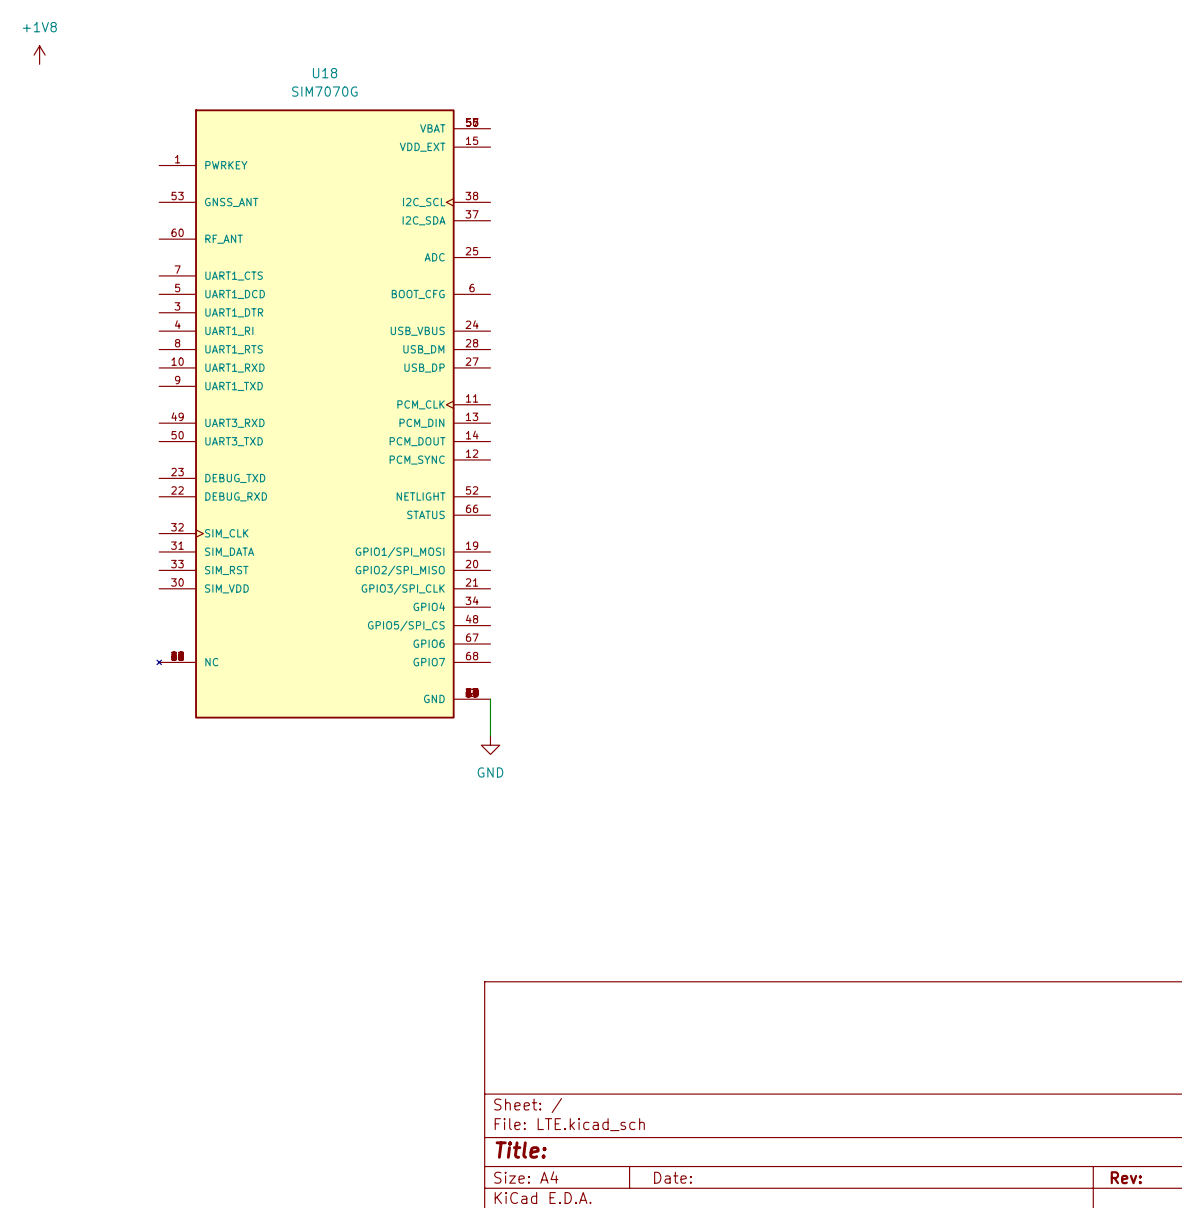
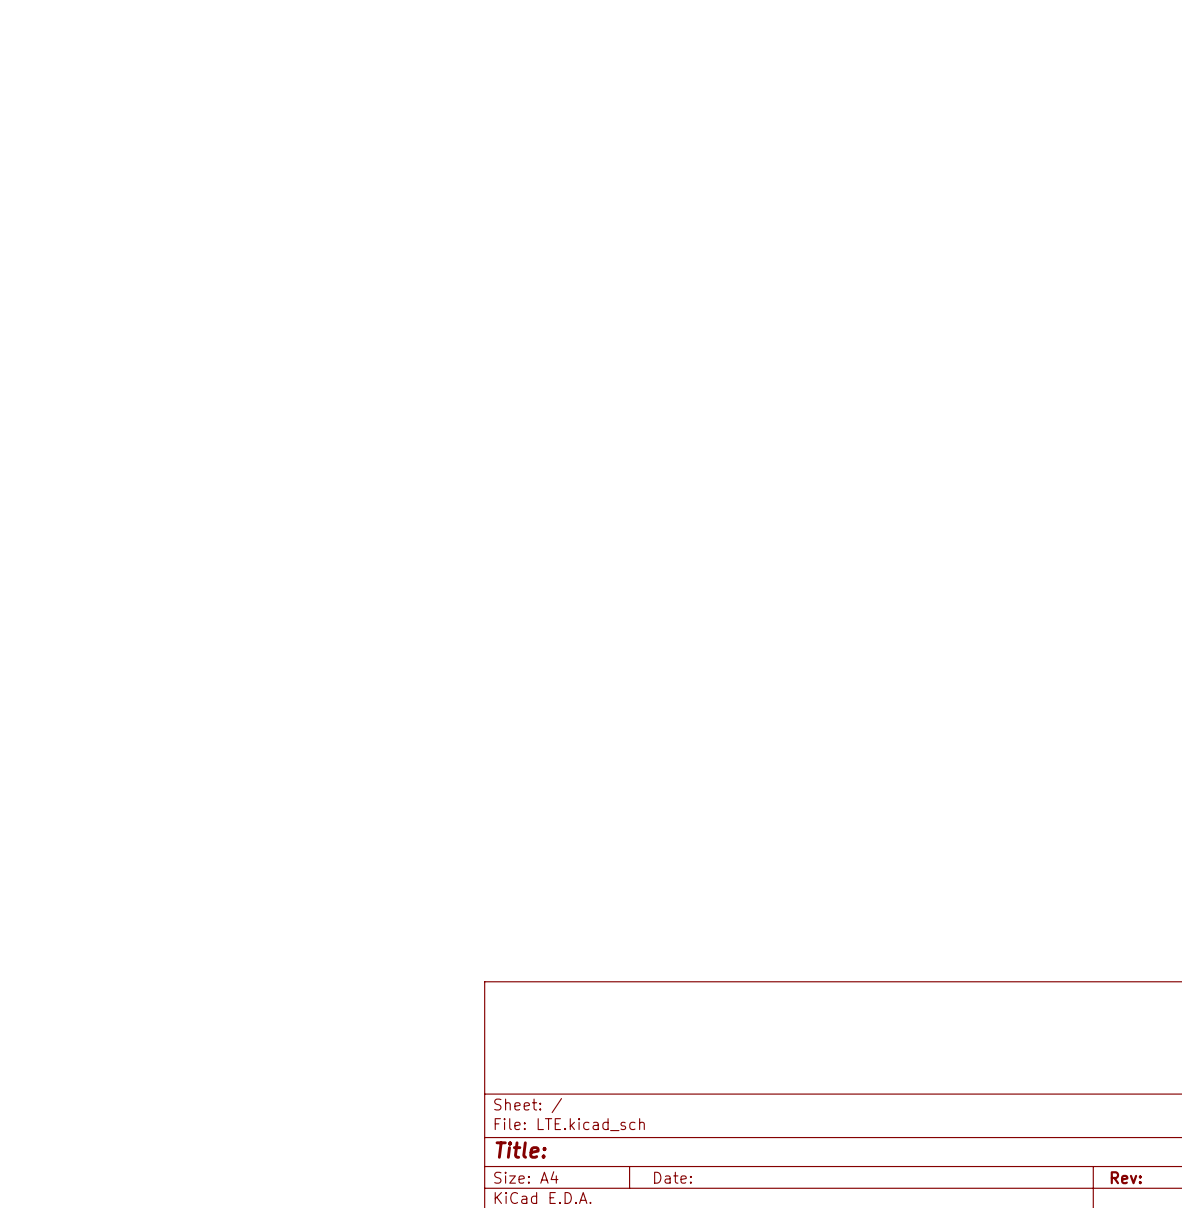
power symbol: +1V8 (39, 55) -> none
U18: SIM7070G (323, 413) -> none
wire: (490, 699) (490, 736) -> none
power symbol: GND (490, 745) -> none

